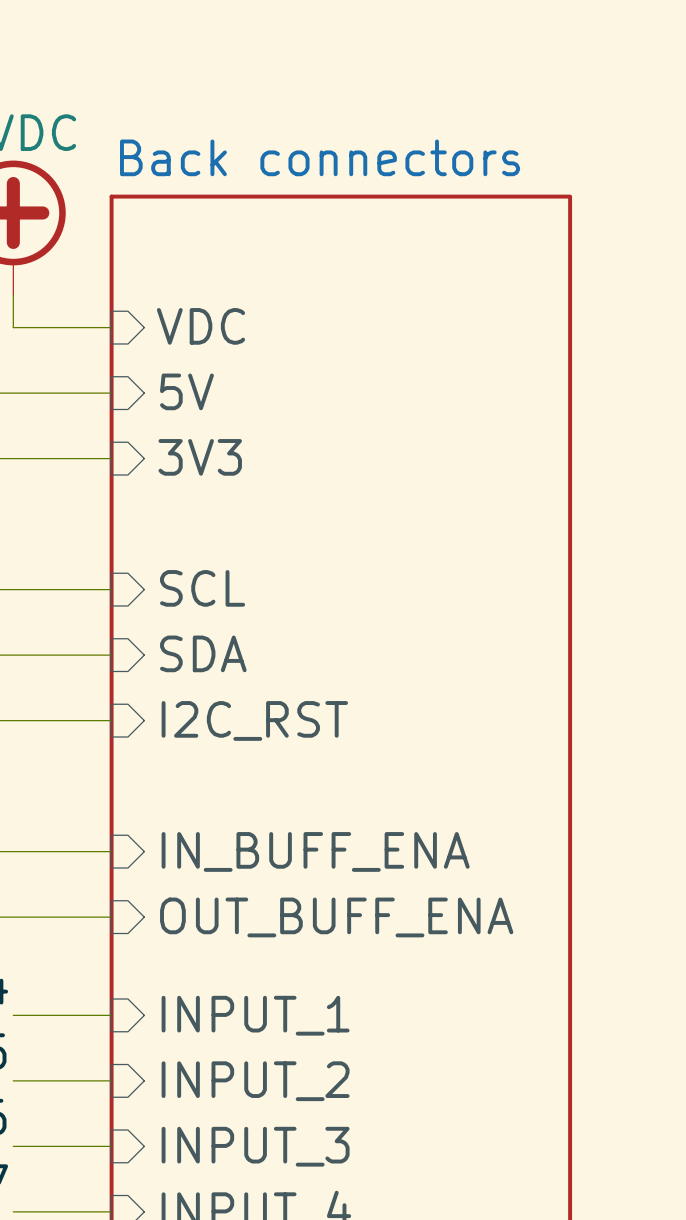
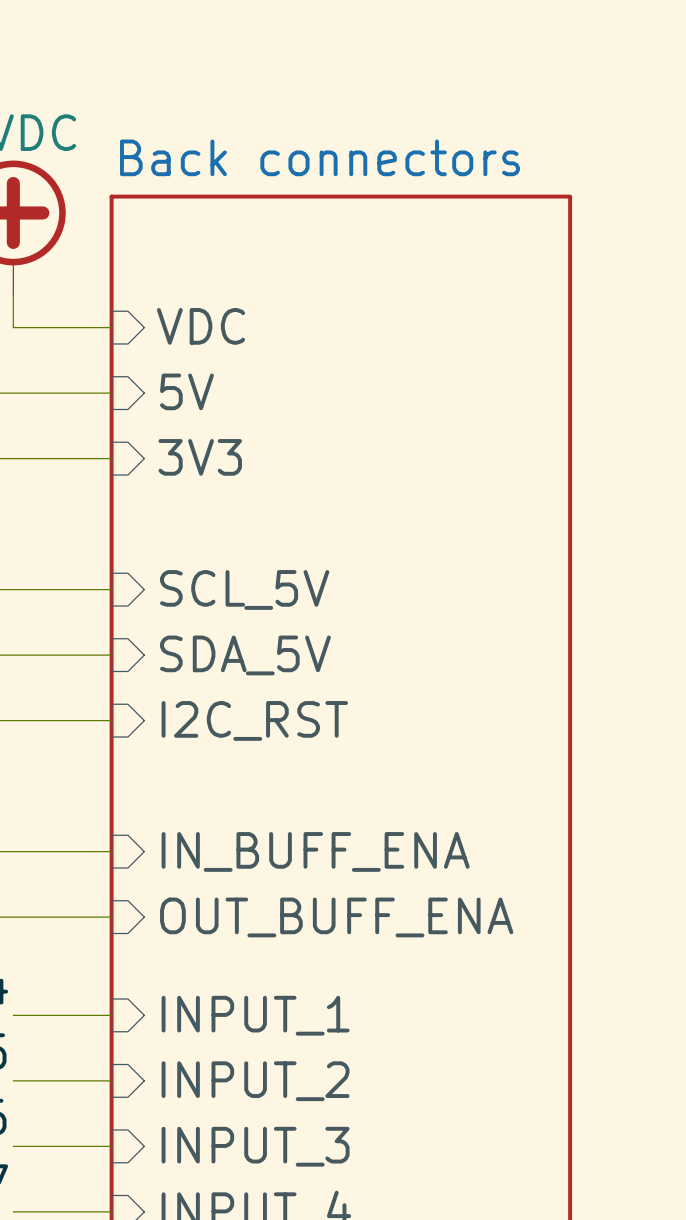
sheet pin: SCL (202, 588) -> SCL_5V (244, 589)
sheet pin: SDA (203, 653) -> SDA_5V (245, 655)

